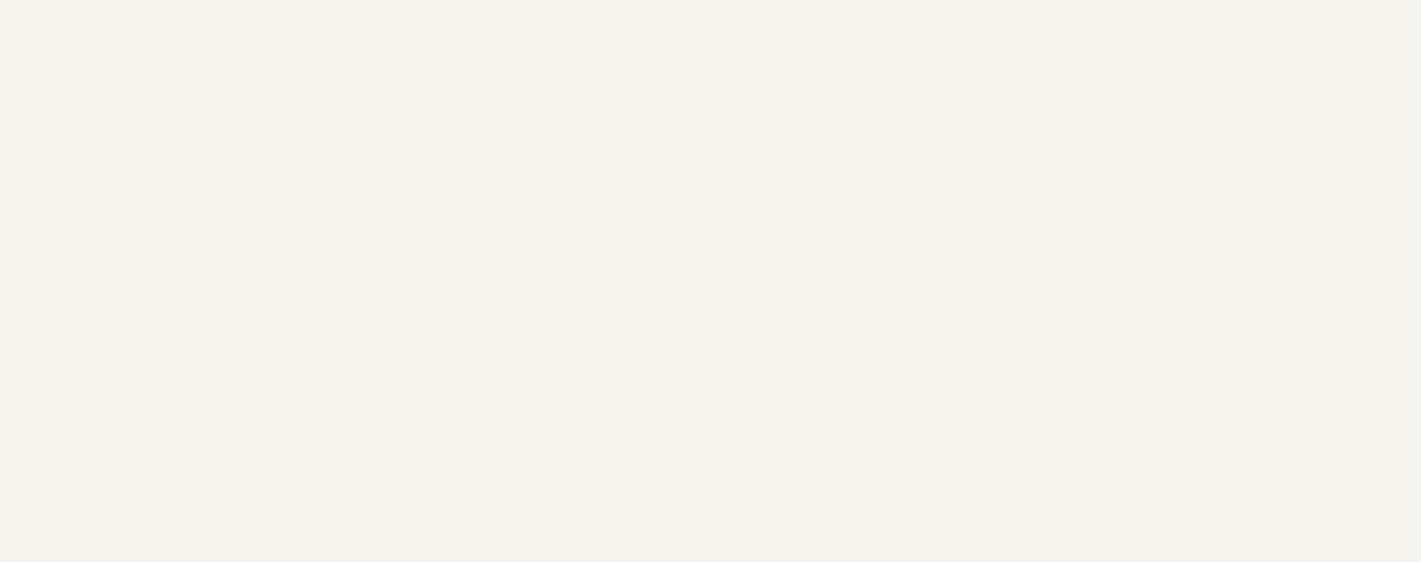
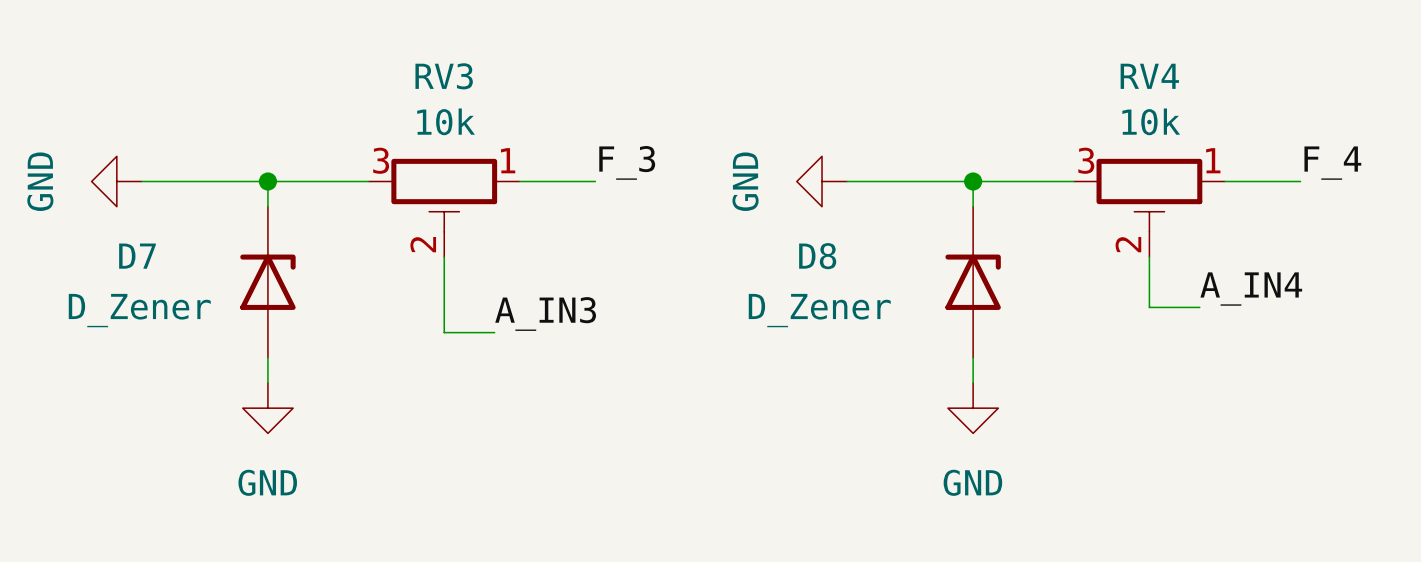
label: none -> F_3 (627, 162)
label: none -> F_4 (1332, 163)
power symbol: none -> GND (116, 181)
wire: none -> (142, 181) (368, 181)
wire: none -> (267, 181) (267, 206)
junction: none -> (267, 181)
wire: none -> (519, 181) (595, 181)
power symbol: none -> GND (822, 181)
wire: none -> (847, 181) (1073, 181)
wire: none -> (973, 181) (973, 206)
junction: none -> (973, 181)
wire: none -> (1224, 181) (1300, 181)
RV3: none -> 10k (444, 207)
RV4: none -> 10k (1149, 207)
wire: none -> (444, 257) (444, 332) (494, 332)
wire: none -> (1149, 257) (1149, 307) (1199, 307)
D7: none -> D_Zener (267, 282)
D8: none -> D_Zener (973, 282)
label: none -> A_IN4 (1251, 289)
label: none -> A_IN3 (545, 313)
wire: none -> (267, 357) (267, 382)
wire: none -> (973, 357) (973, 382)
power symbol: none -> GND (267, 408)
power symbol: none -> GND (973, 408)

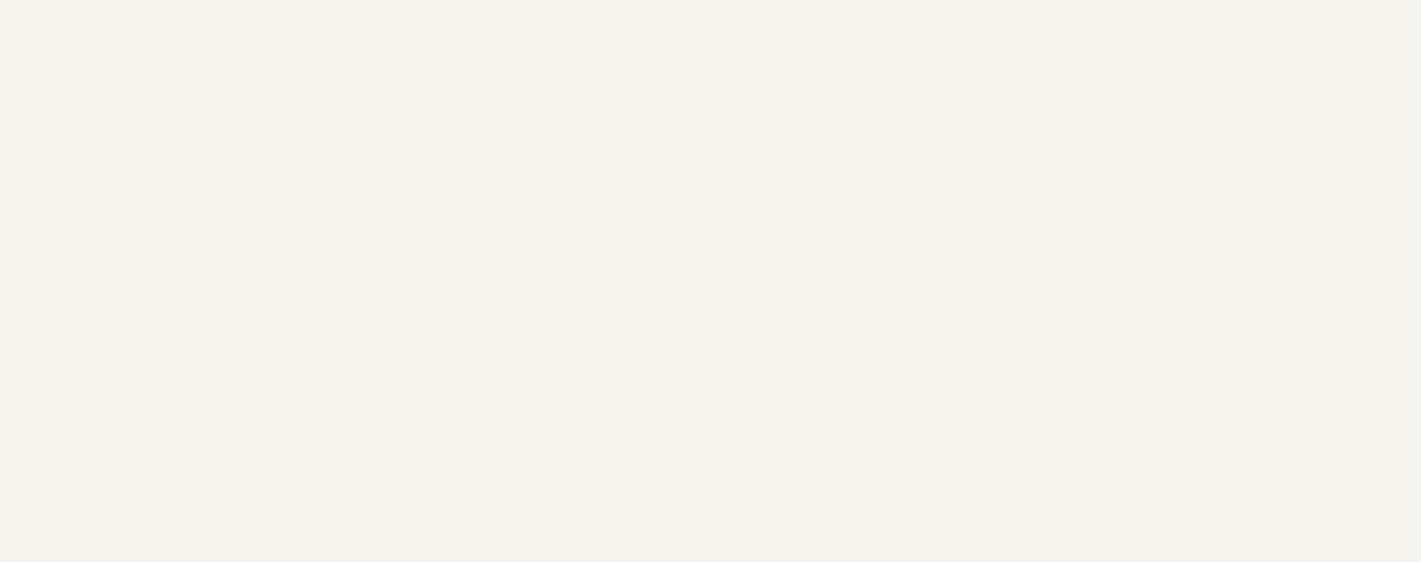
label: F_3 (627, 162) -> none
label: F_4 (1332, 163) -> none
power symbol: GND (116, 181) -> none
wire: (142, 181) (368, 181) -> none
wire: (267, 181) (267, 206) -> none
junction: (267, 181) -> none
wire: (519, 181) (595, 181) -> none
power symbol: GND (822, 181) -> none
wire: (847, 181) (1073, 181) -> none
wire: (973, 181) (973, 206) -> none
junction: (973, 181) -> none
wire: (1224, 181) (1300, 181) -> none
RV3: 10k (444, 207) -> none
RV4: 10k (1149, 207) -> none
wire: (444, 257) (444, 332) (494, 332) -> none
wire: (1149, 257) (1149, 307) (1199, 307) -> none
D7: D_Zener (267, 282) -> none
D8: D_Zener (973, 282) -> none
label: A_IN4 (1251, 289) -> none
label: A_IN3 (545, 313) -> none
wire: (267, 357) (267, 382) -> none
wire: (973, 357) (973, 382) -> none
power symbol: GND (267, 408) -> none
power symbol: GND (973, 408) -> none

